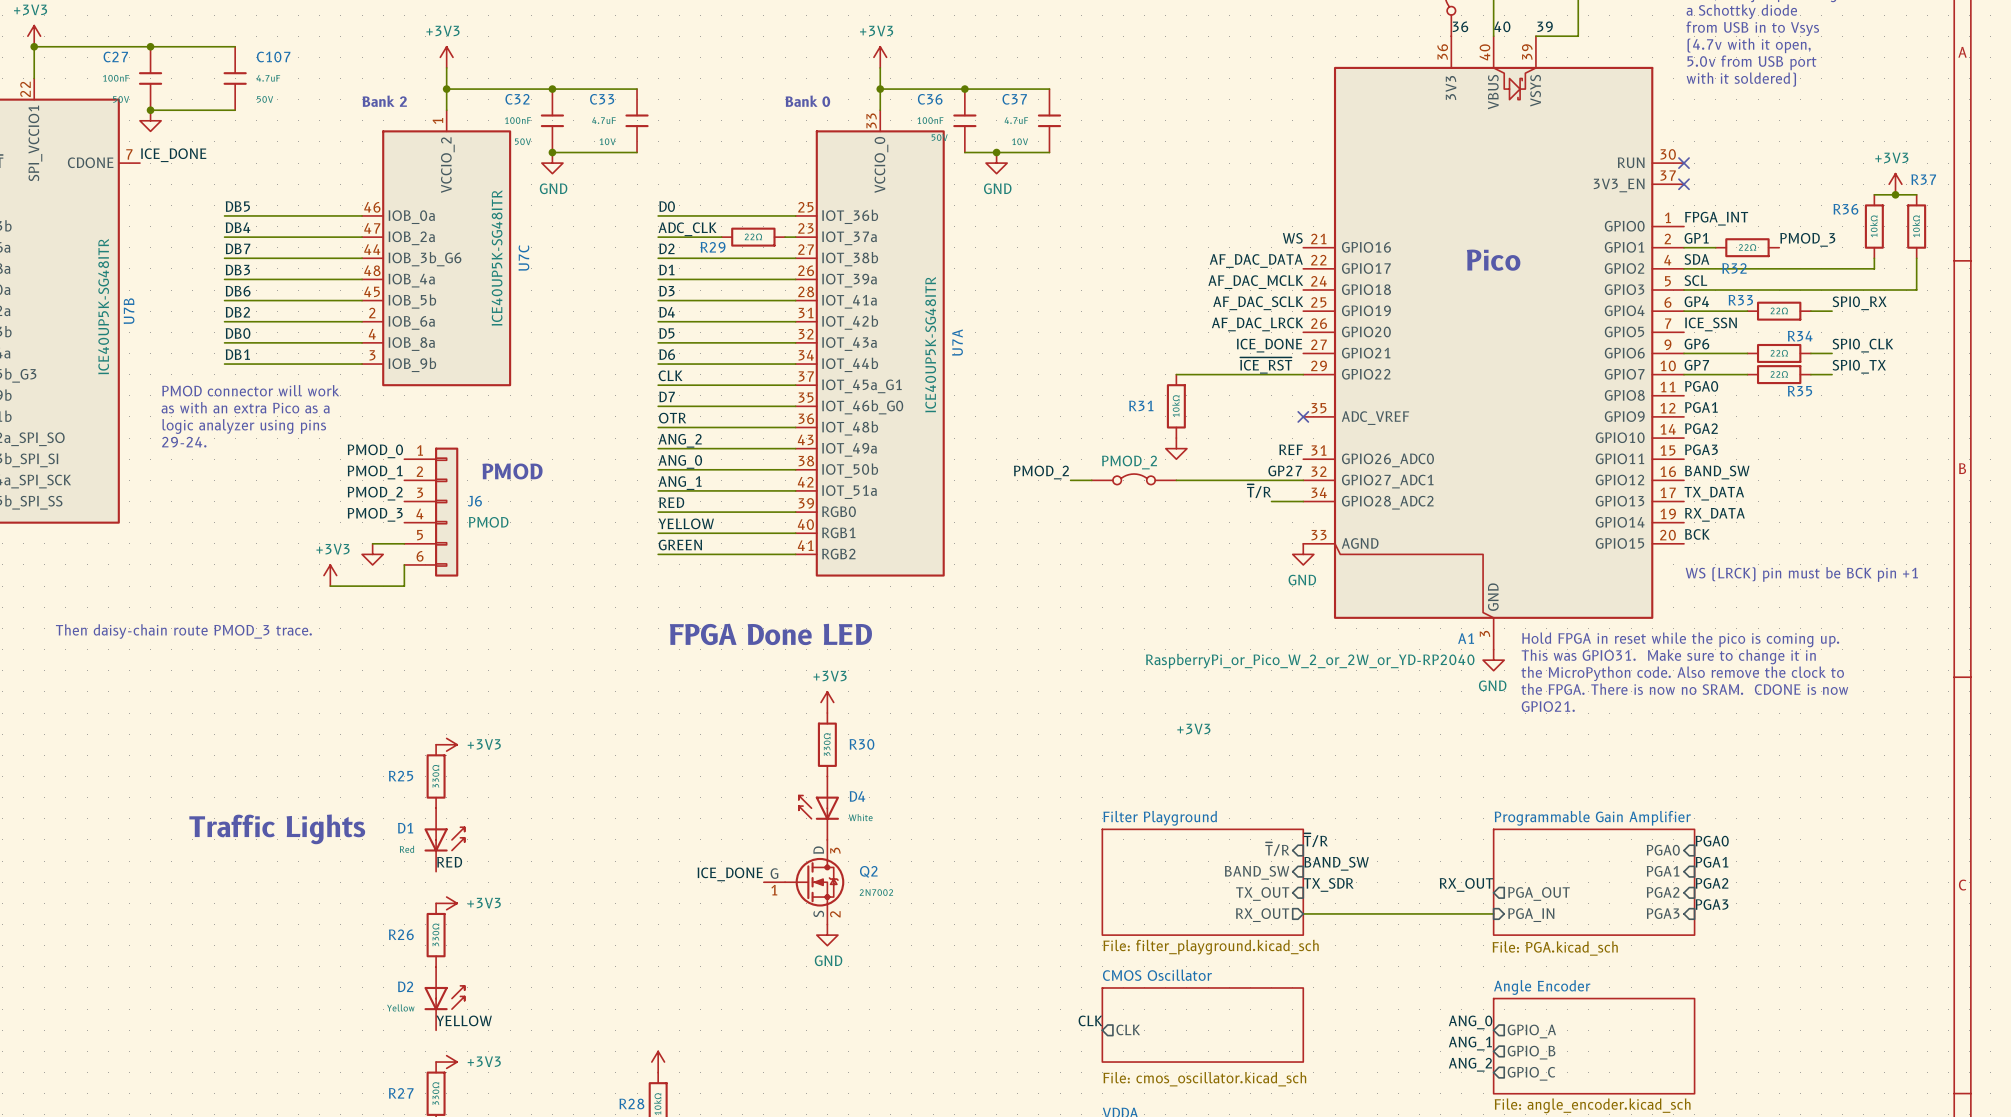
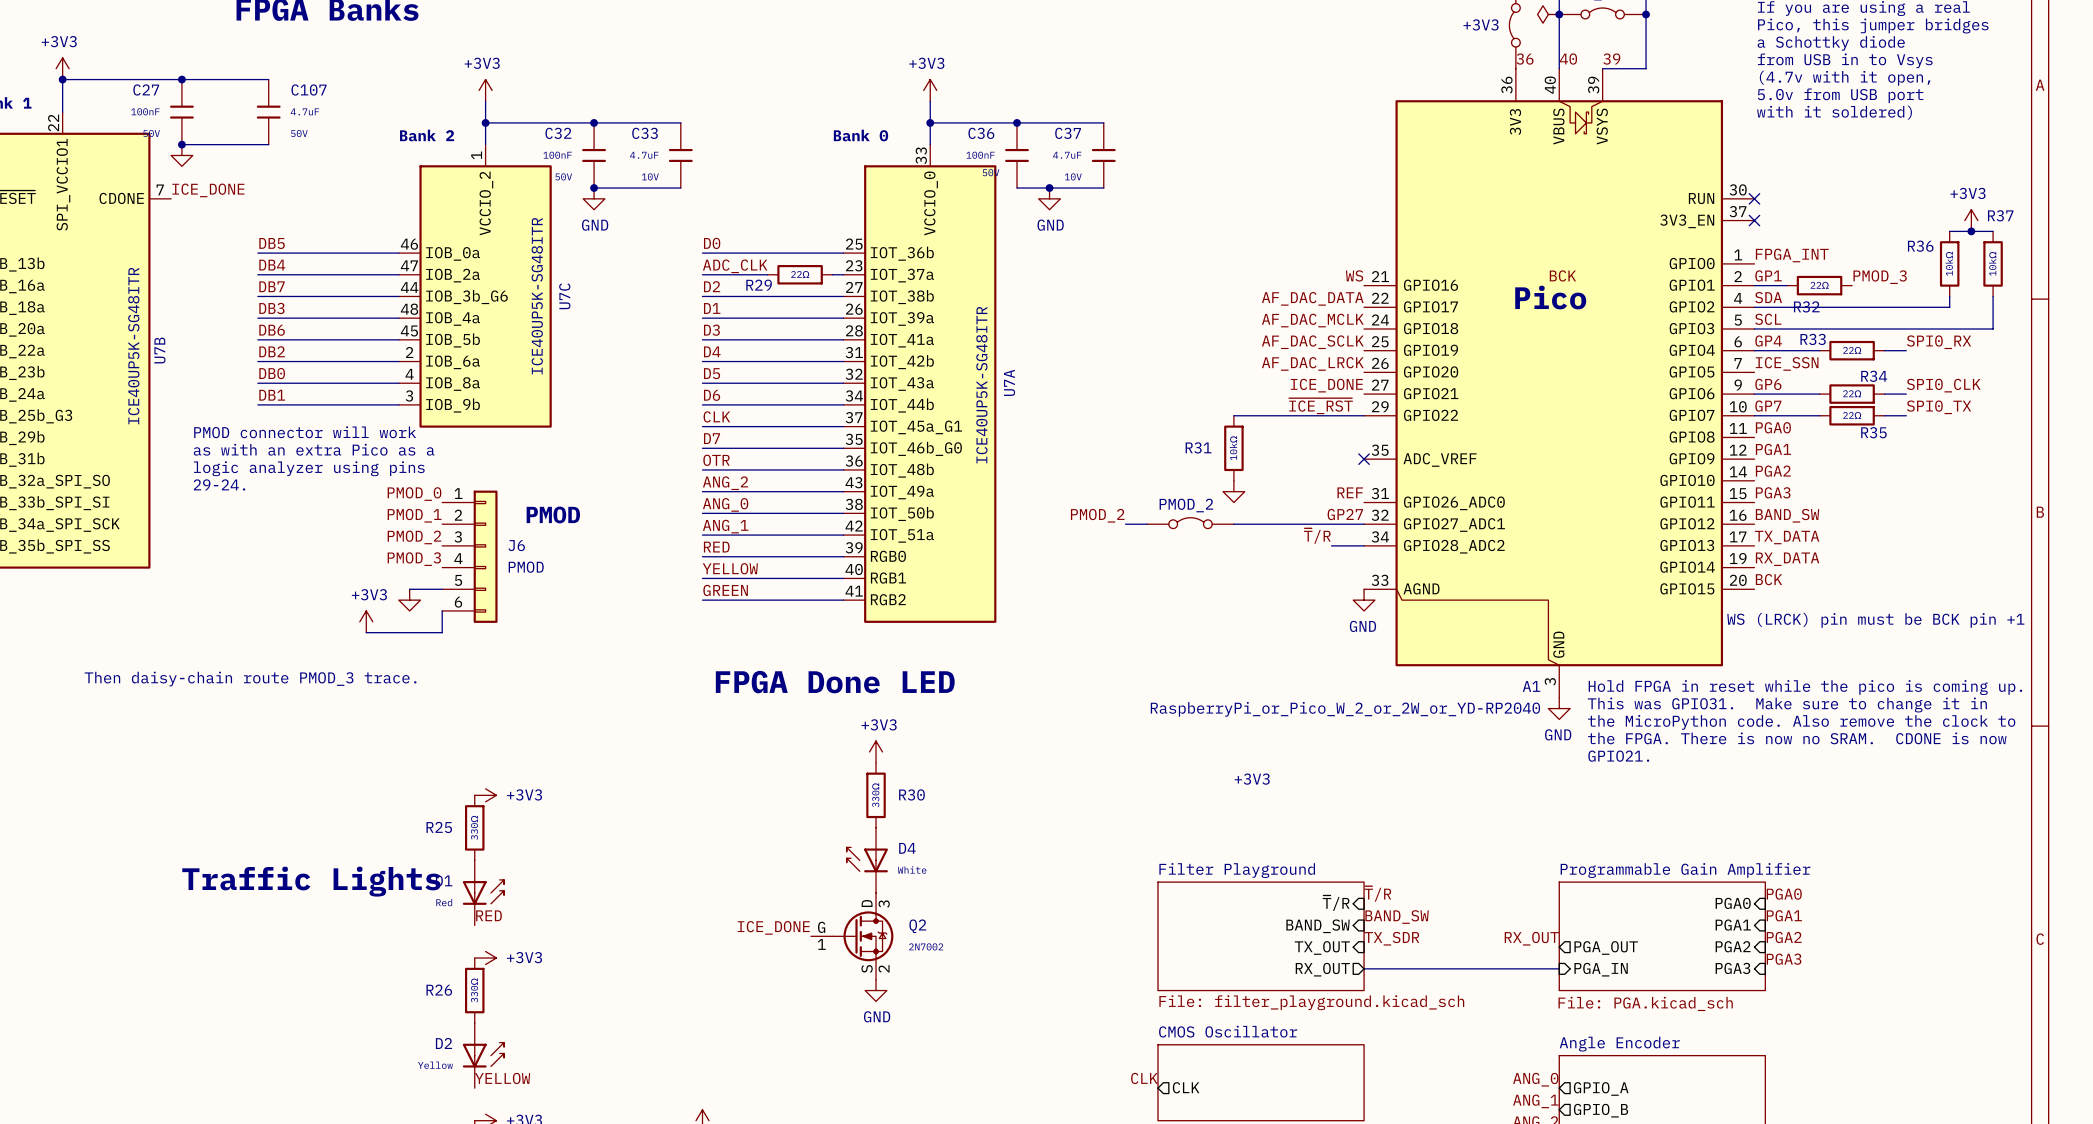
label: none -> BCK (1562, 275)

